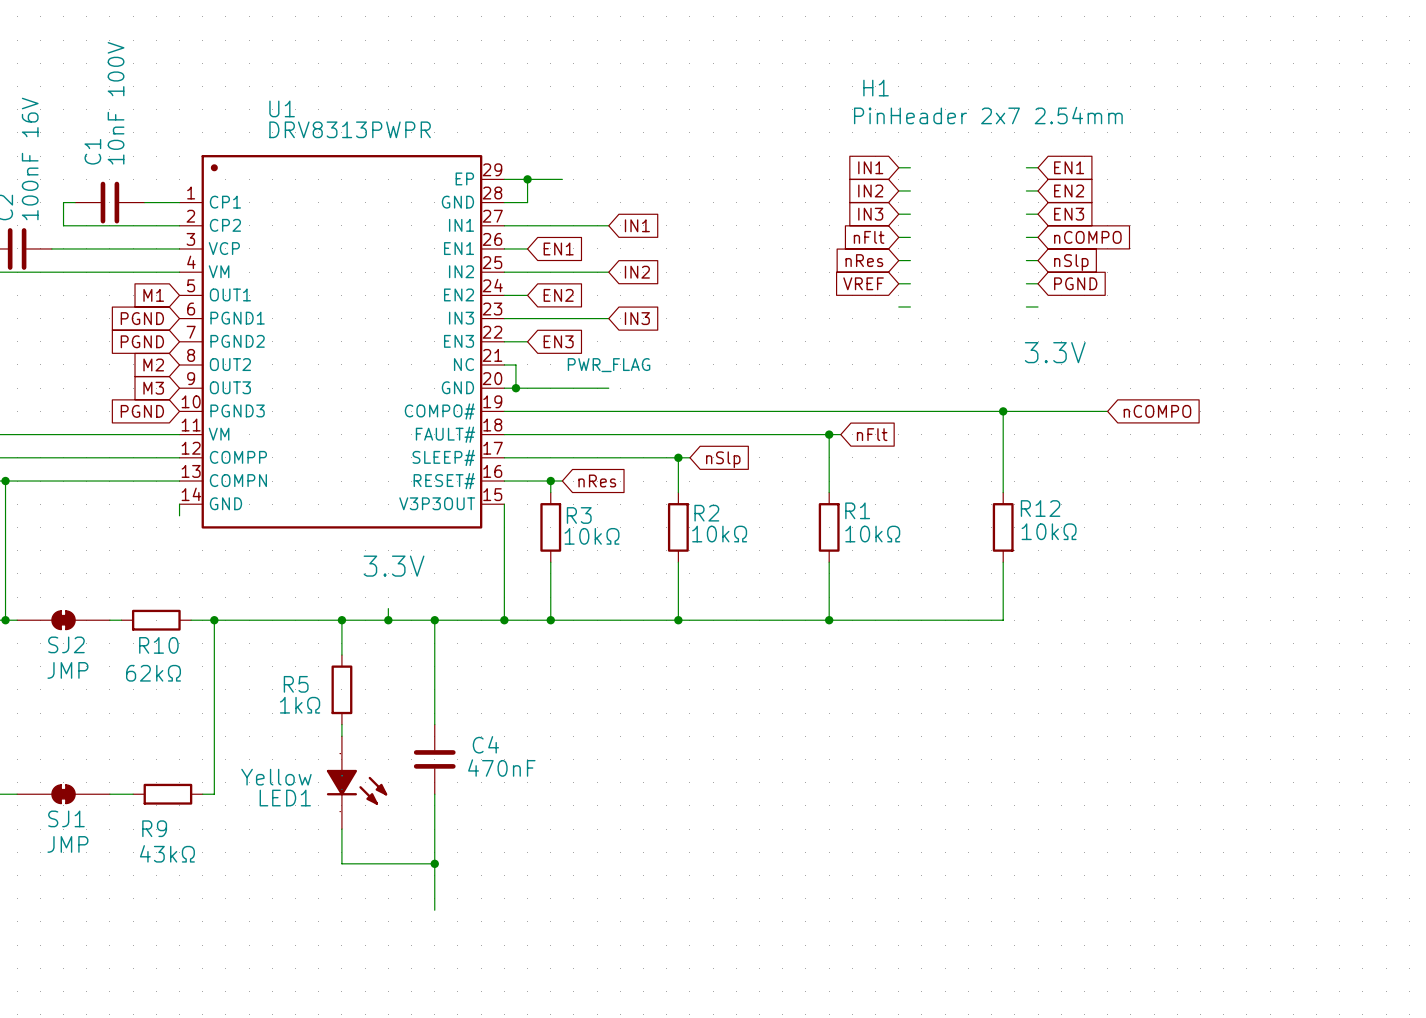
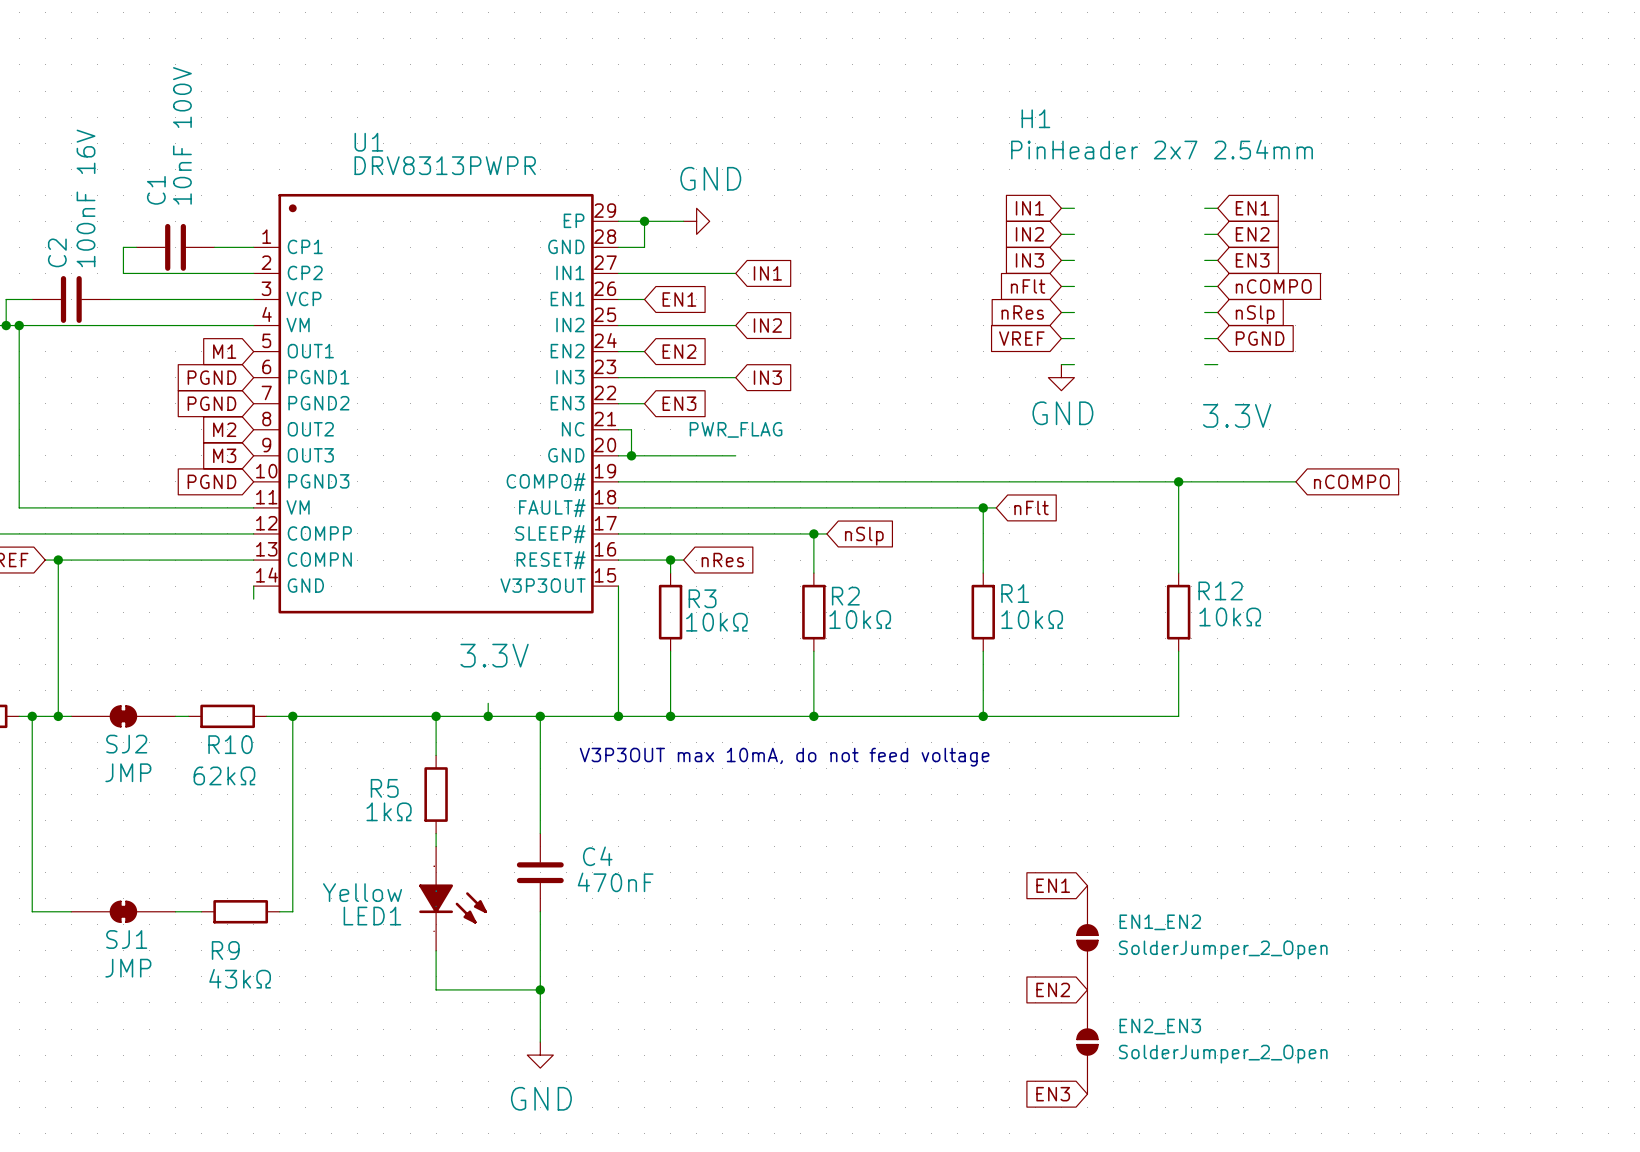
power symbol: none -> GND (696, 221)
power symbol: none -> GND (1061, 377)
text: none -> V3P3OUT max 10mA, do not feed voltage (784, 757)
global label: none -> EN1 (1053, 885)
EN1_EN2: none -> SolderJumper_2_Open (1087, 937)
global label: none -> EN2 (1053, 989)
EN2_EN3: none -> SolderJumper_2_Open (1087, 1042)
power symbol: none -> GND (540, 1055)
global label: none -> EN3 (1053, 1094)

